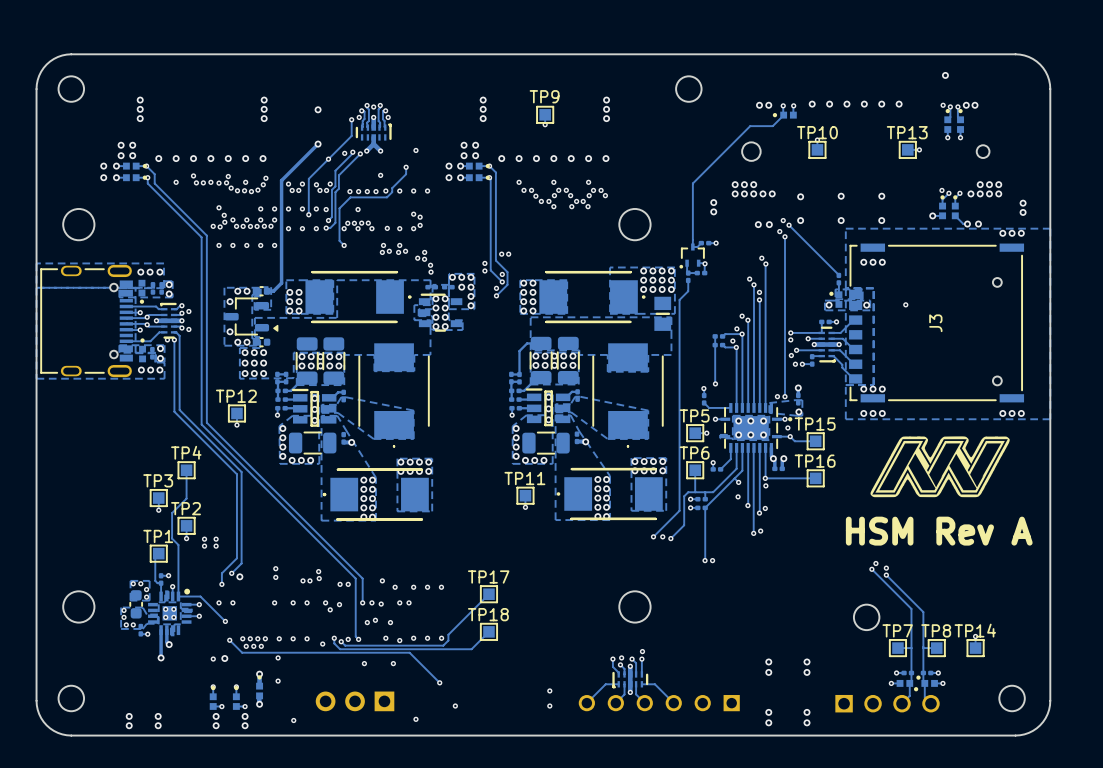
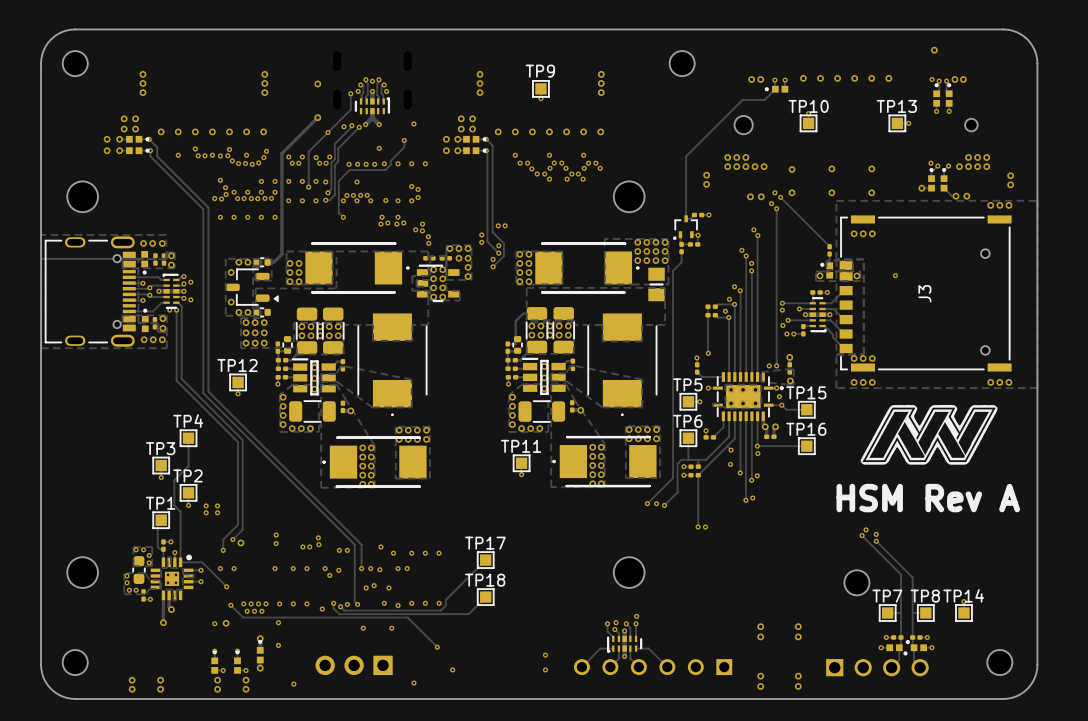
part footprint: [283, 371, 289, 385] -> [282, 336, 293, 354]
part footprint: [517, 371, 522, 385] -> [512, 336, 523, 354]
track: (286, 374) (277, 374) -> none

